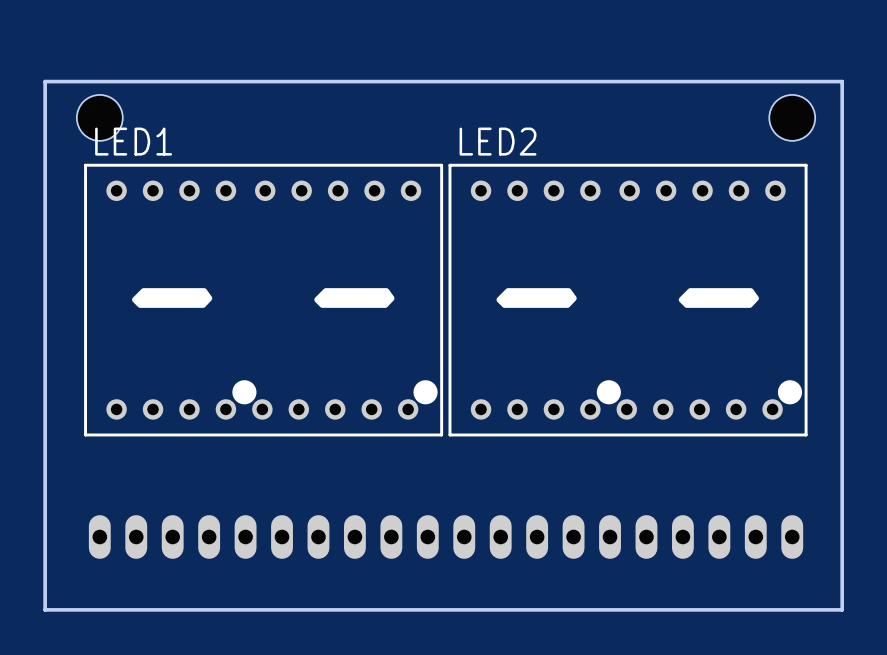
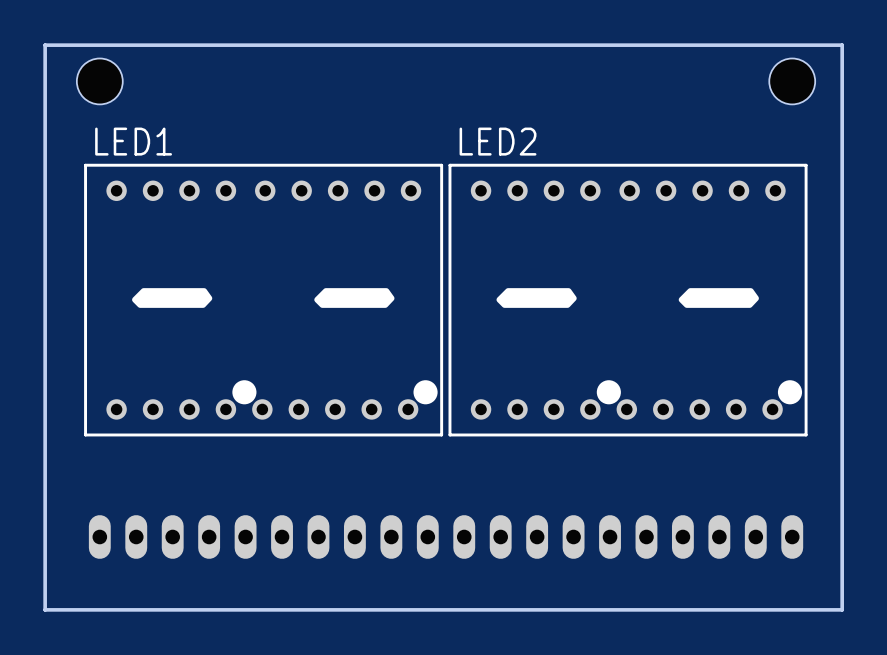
board edge: (45, 81) (842, 81) -> (45, 81) (45, 45) (842, 45) (842, 81)
hole position: (99, 117) -> (99, 81)
hole position: (792, 117) -> (792, 81)

